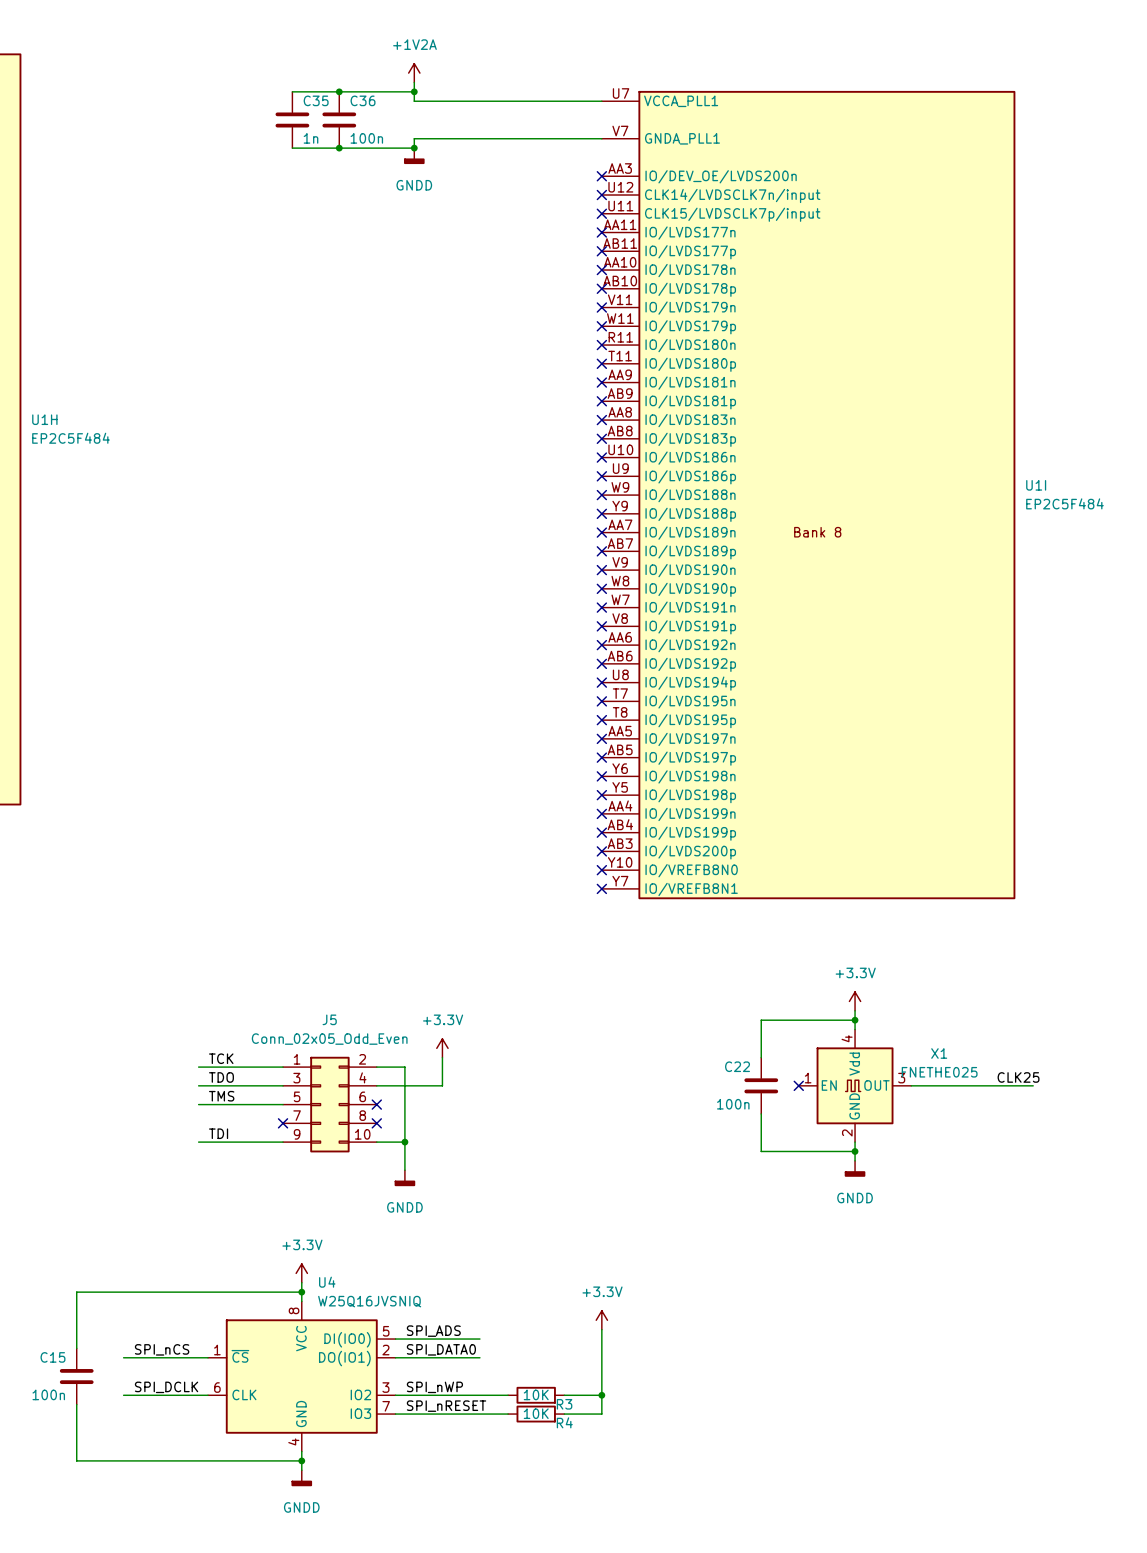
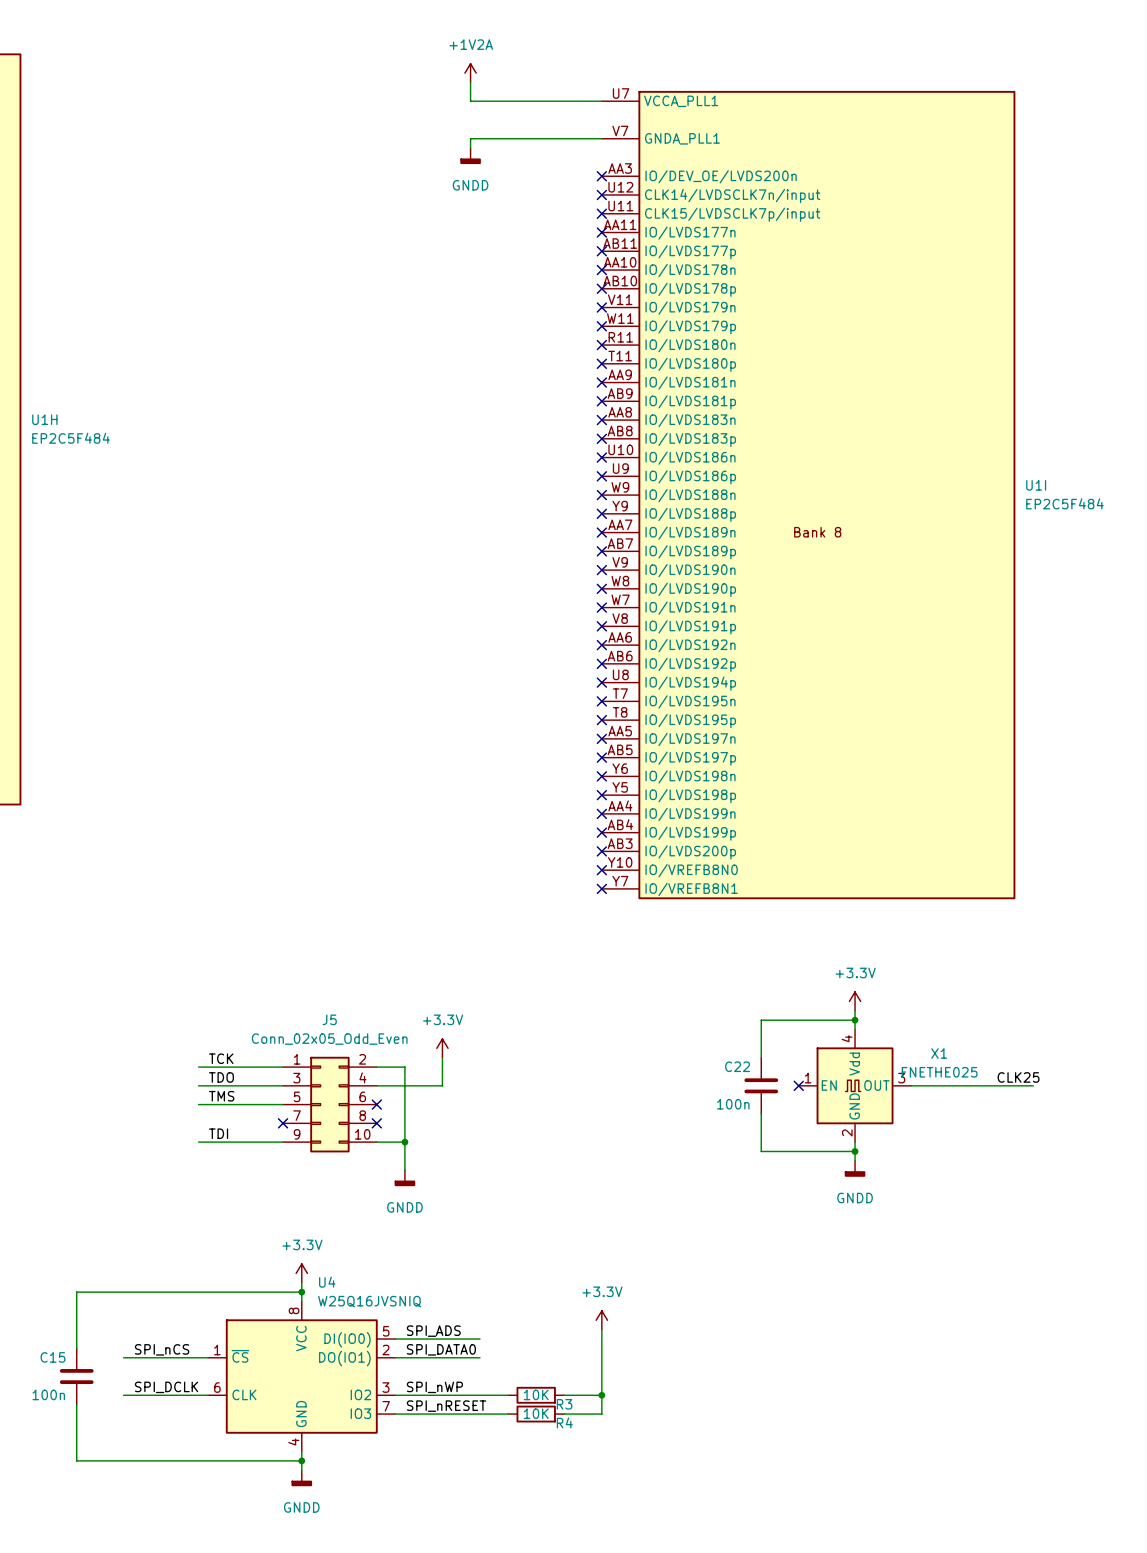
power symbol position: +1V2A (414, 73) -> +1V2A (470, 73)
wire: (414, 82) (414, 101) (470, 101) -> (470, 82) (470, 101)
wire: (292, 91) (414, 91) -> none
junction: (339, 91) -> none
junction: (414, 91) -> none
C35: 1n (292, 119) -> none
C36: 100n (339, 119) -> none
wire: (470, 138) (414, 138) (414, 148) (292, 148) -> (470, 138) (470, 148)
junction: (339, 148) -> none
junction: (414, 148) -> none
power symbol position: GNDD (414, 156) -> GNDD (470, 156)

